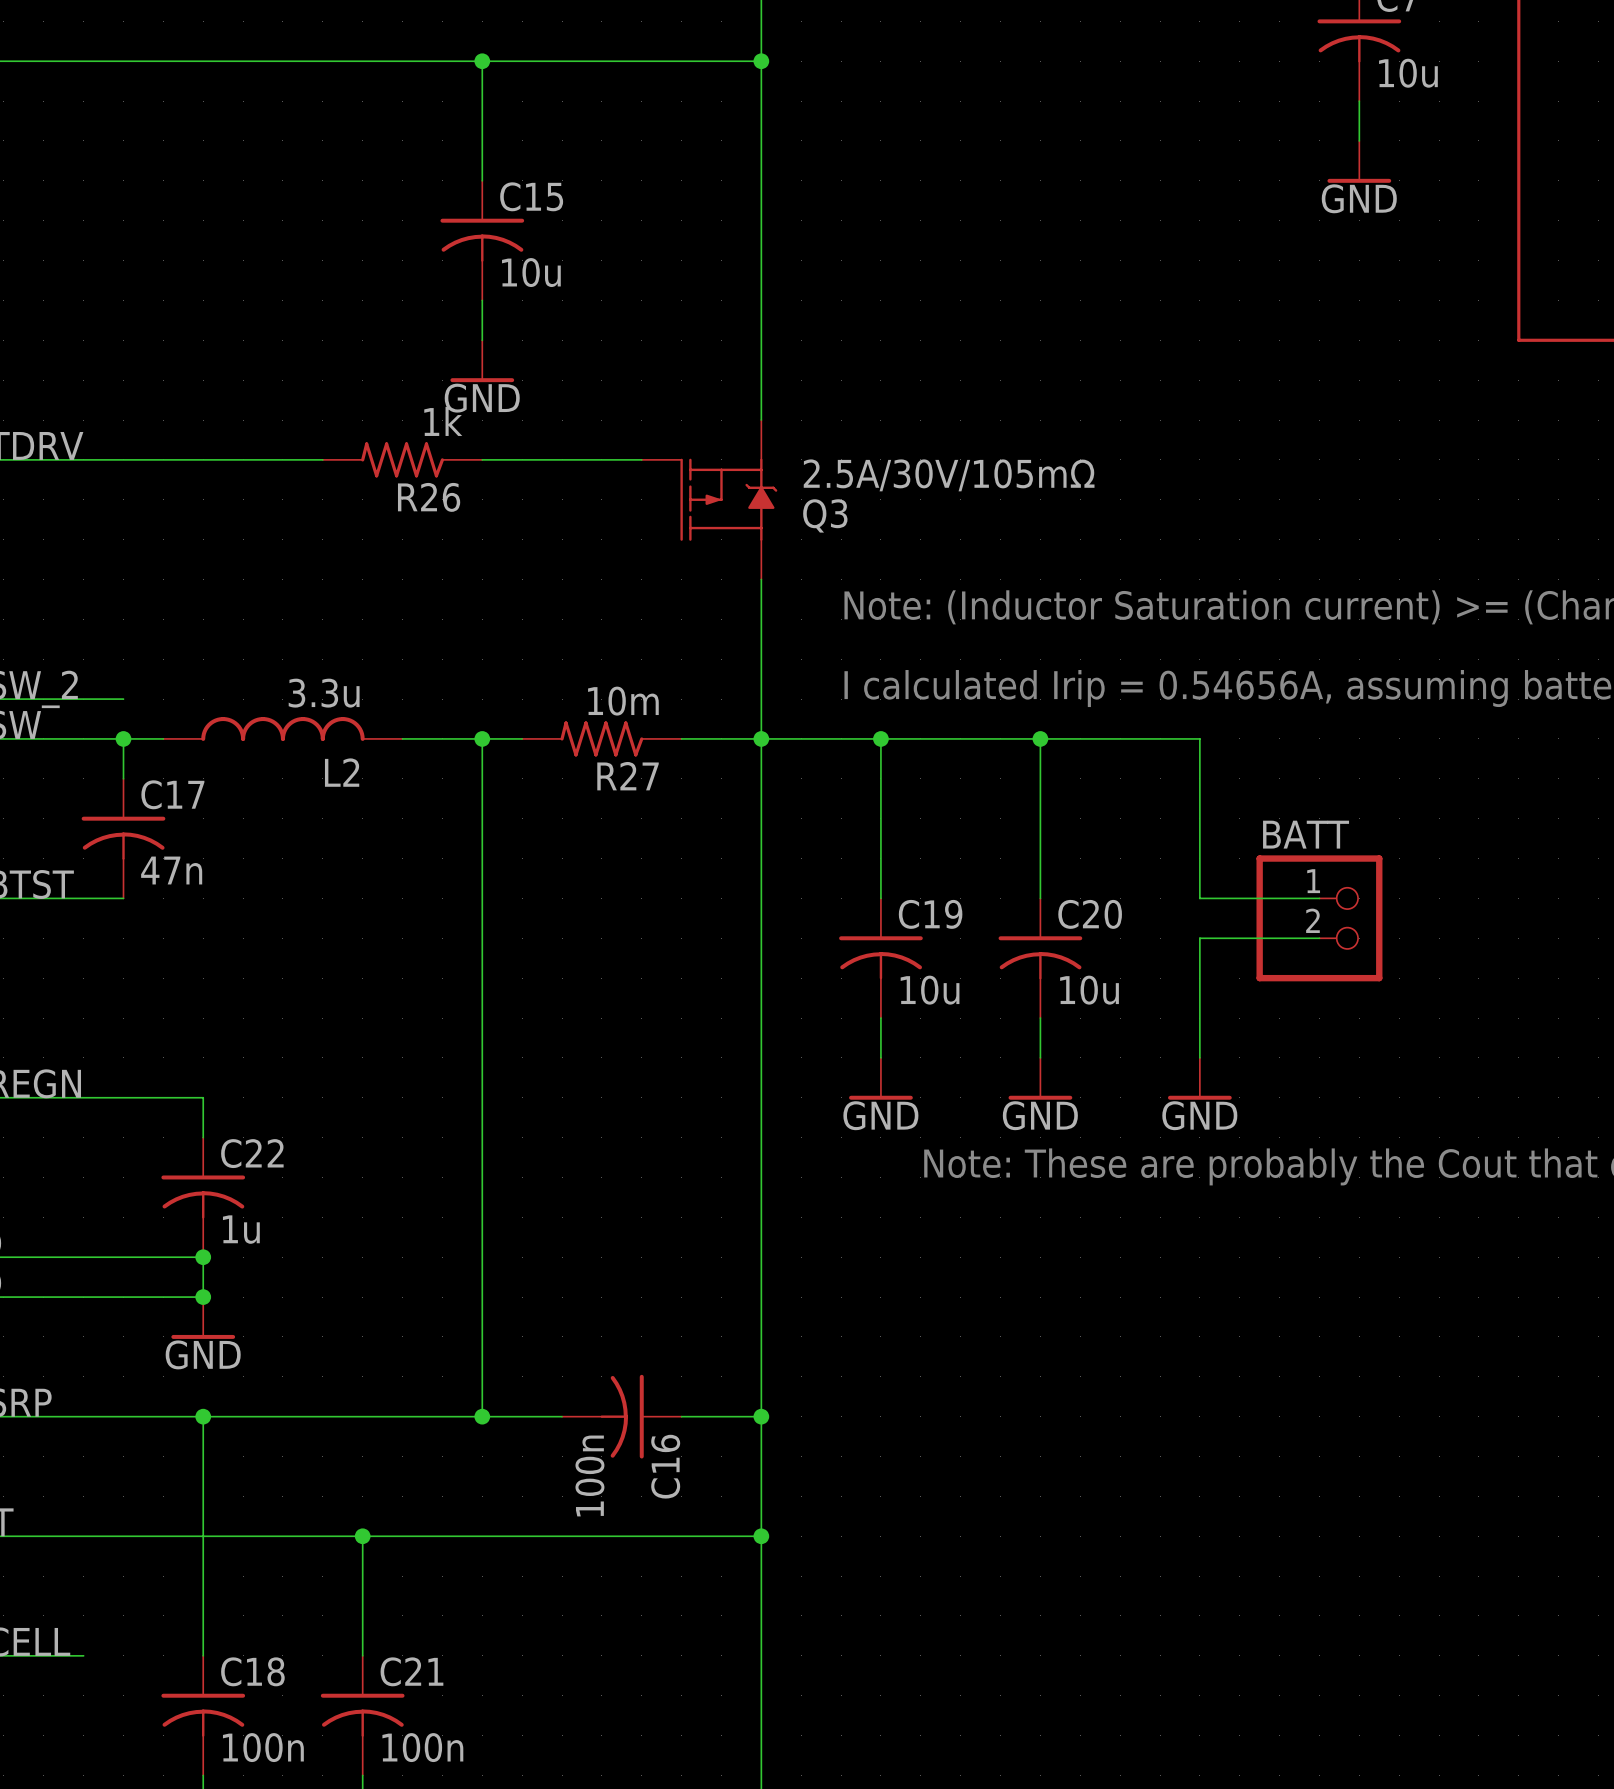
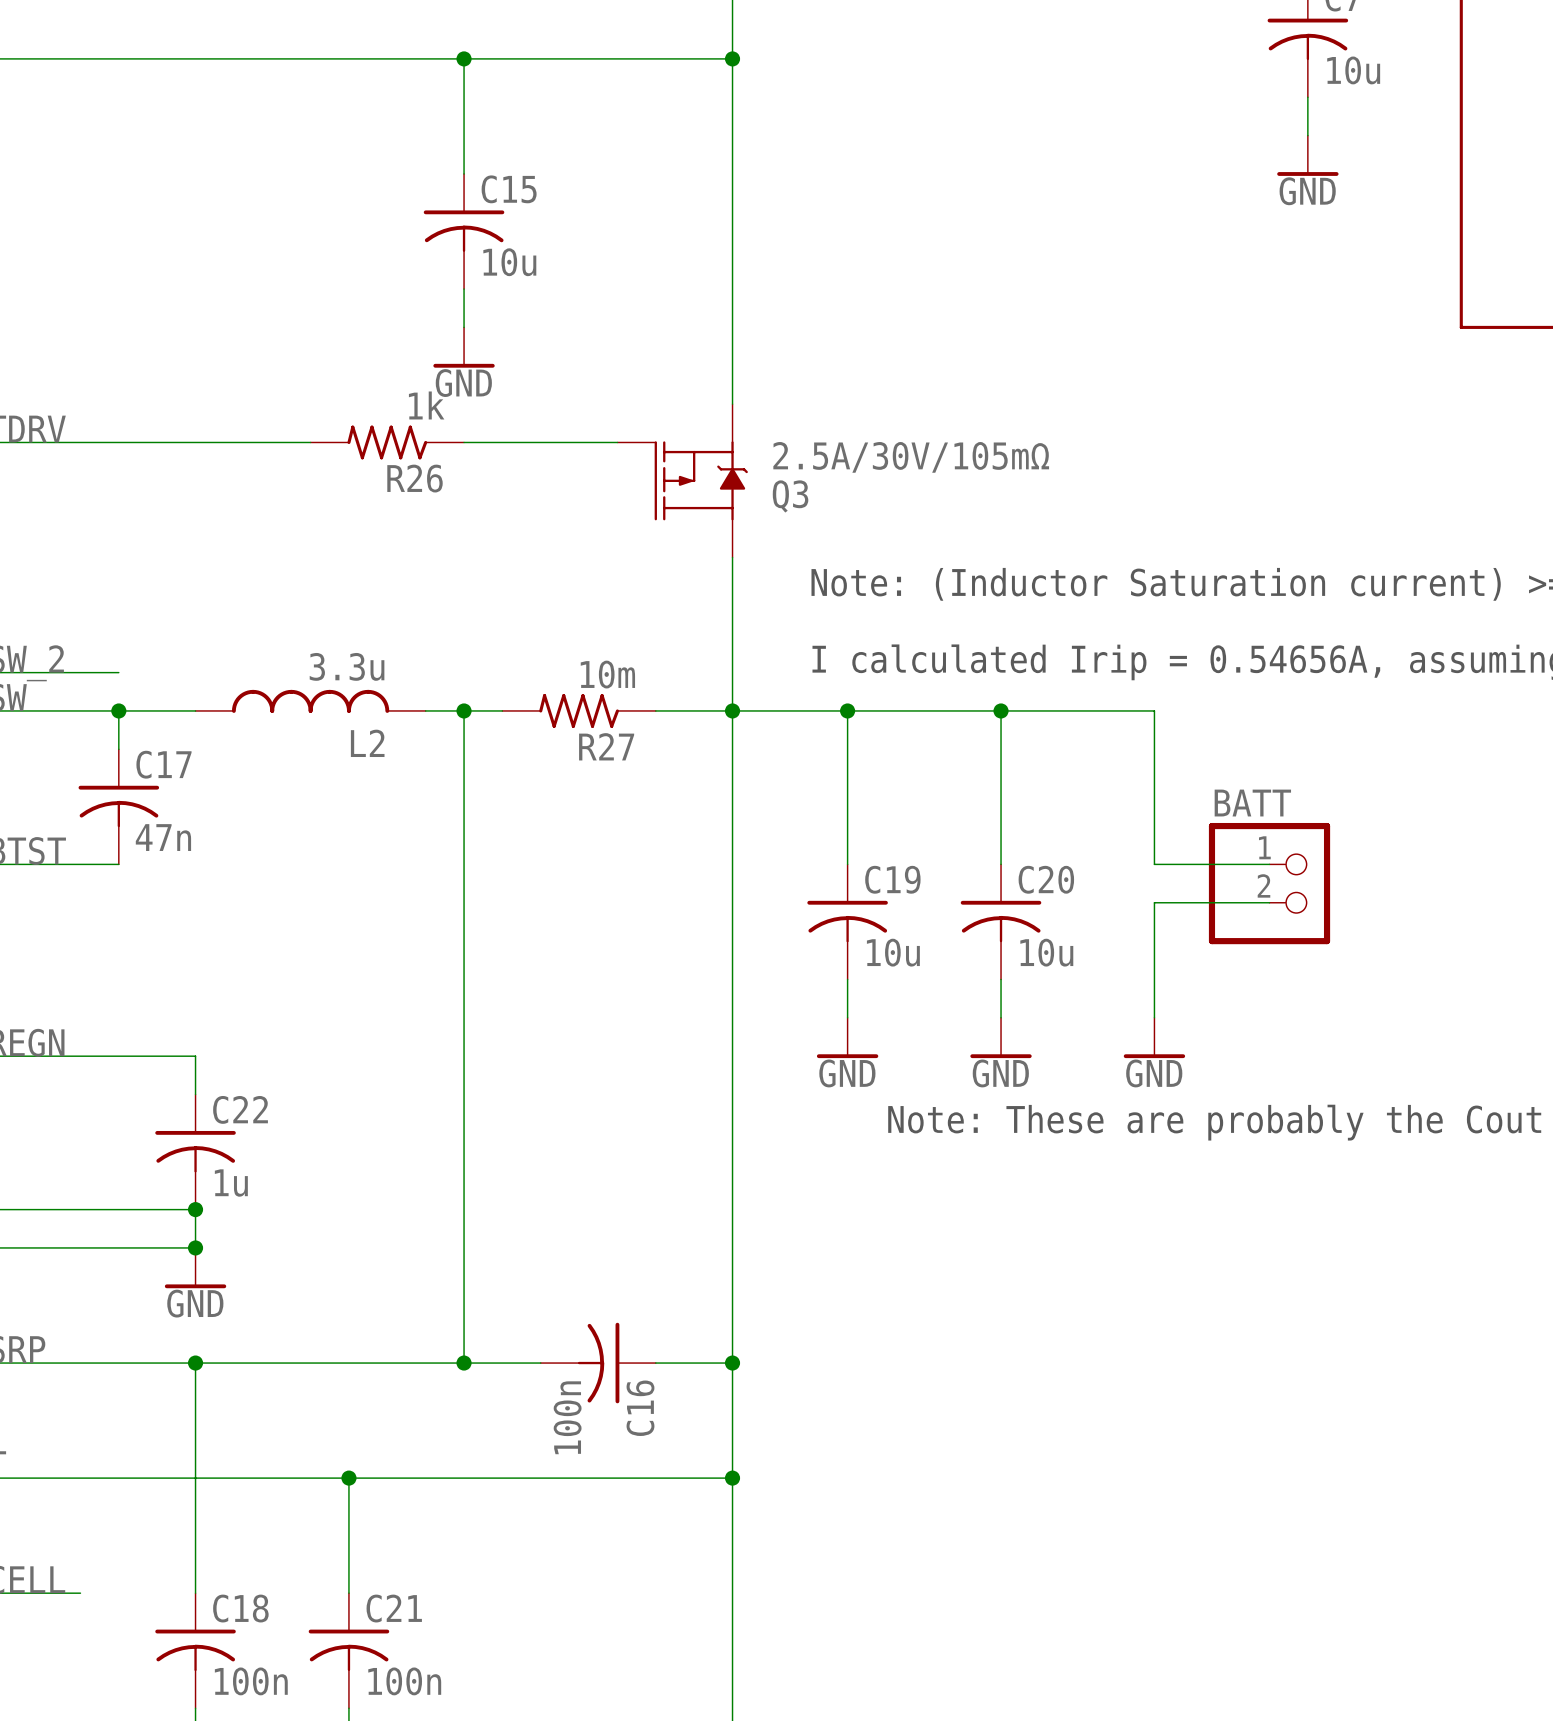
L2 position: (282, 728) -> (310, 701)

